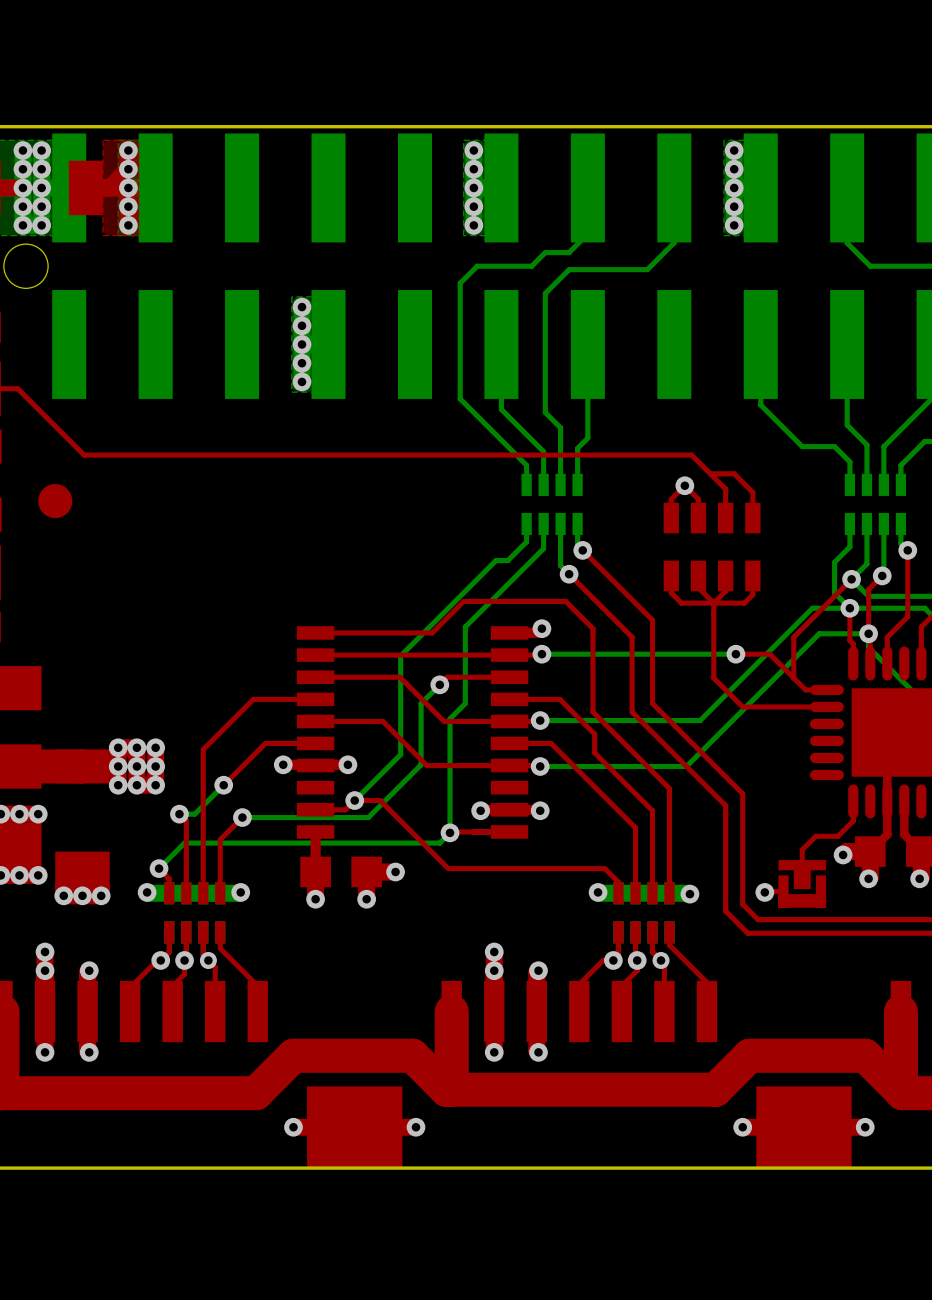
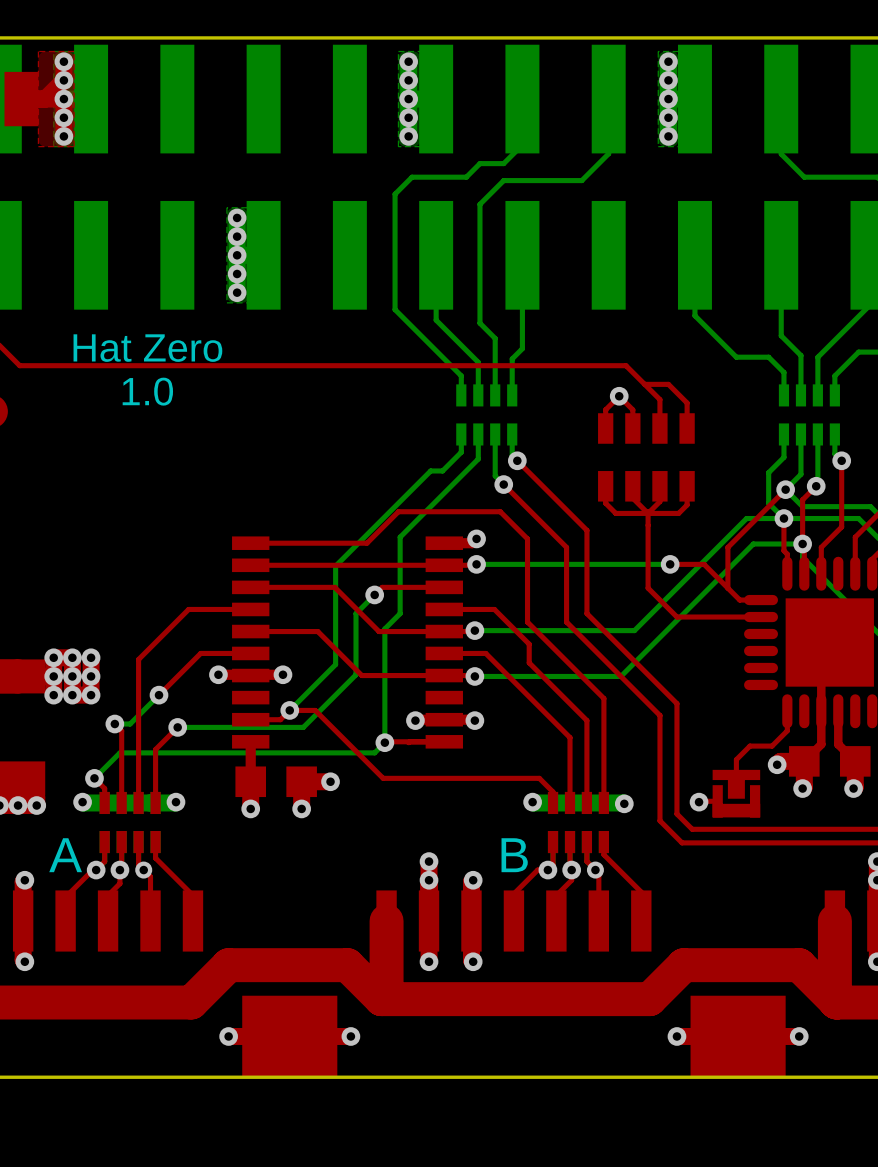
text: none -> Hat Zero (147, 348)
text: none -> 1.0 (147, 391)
text: none -> A (65, 855)
text: none -> B (514, 855)

